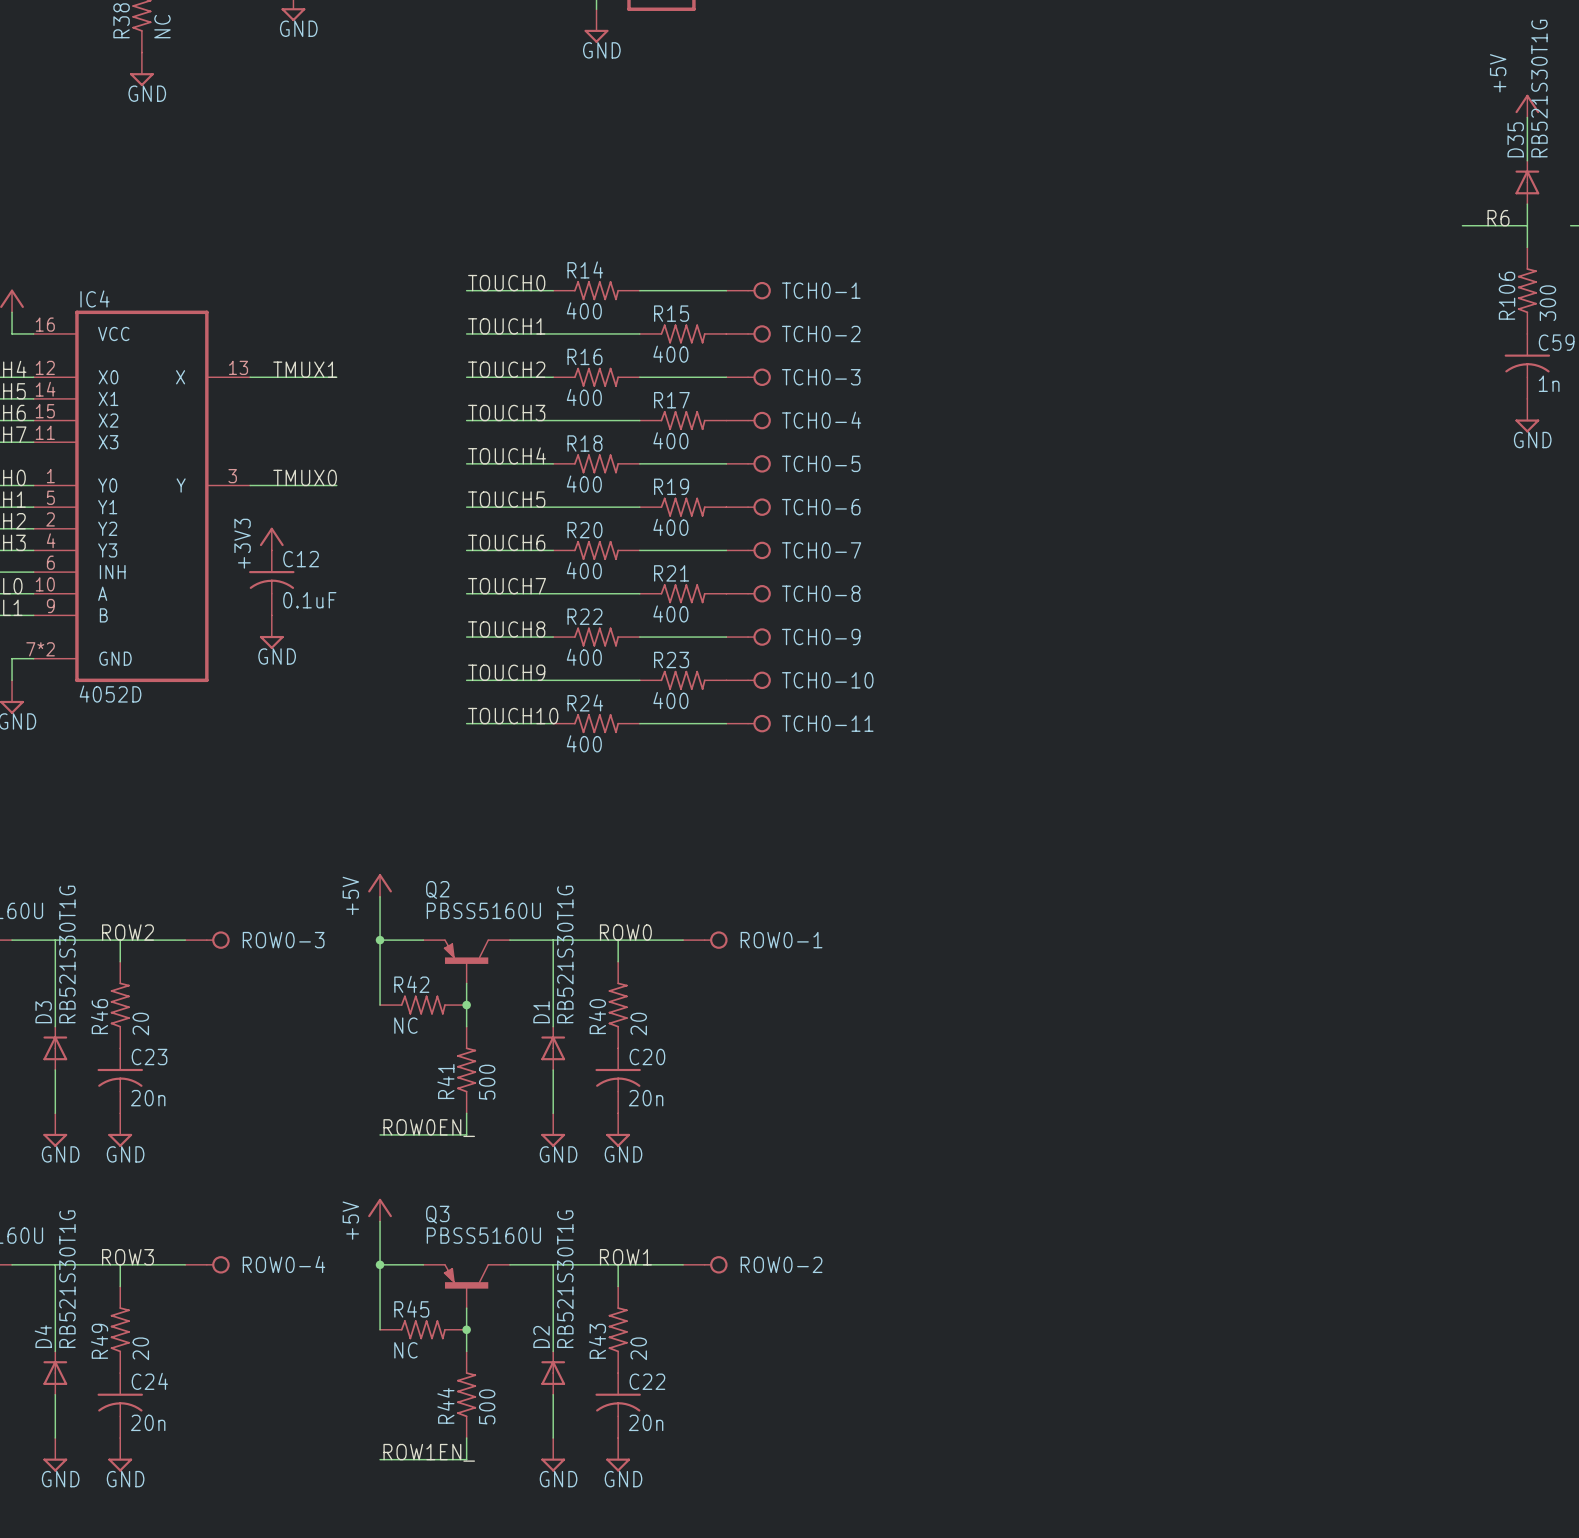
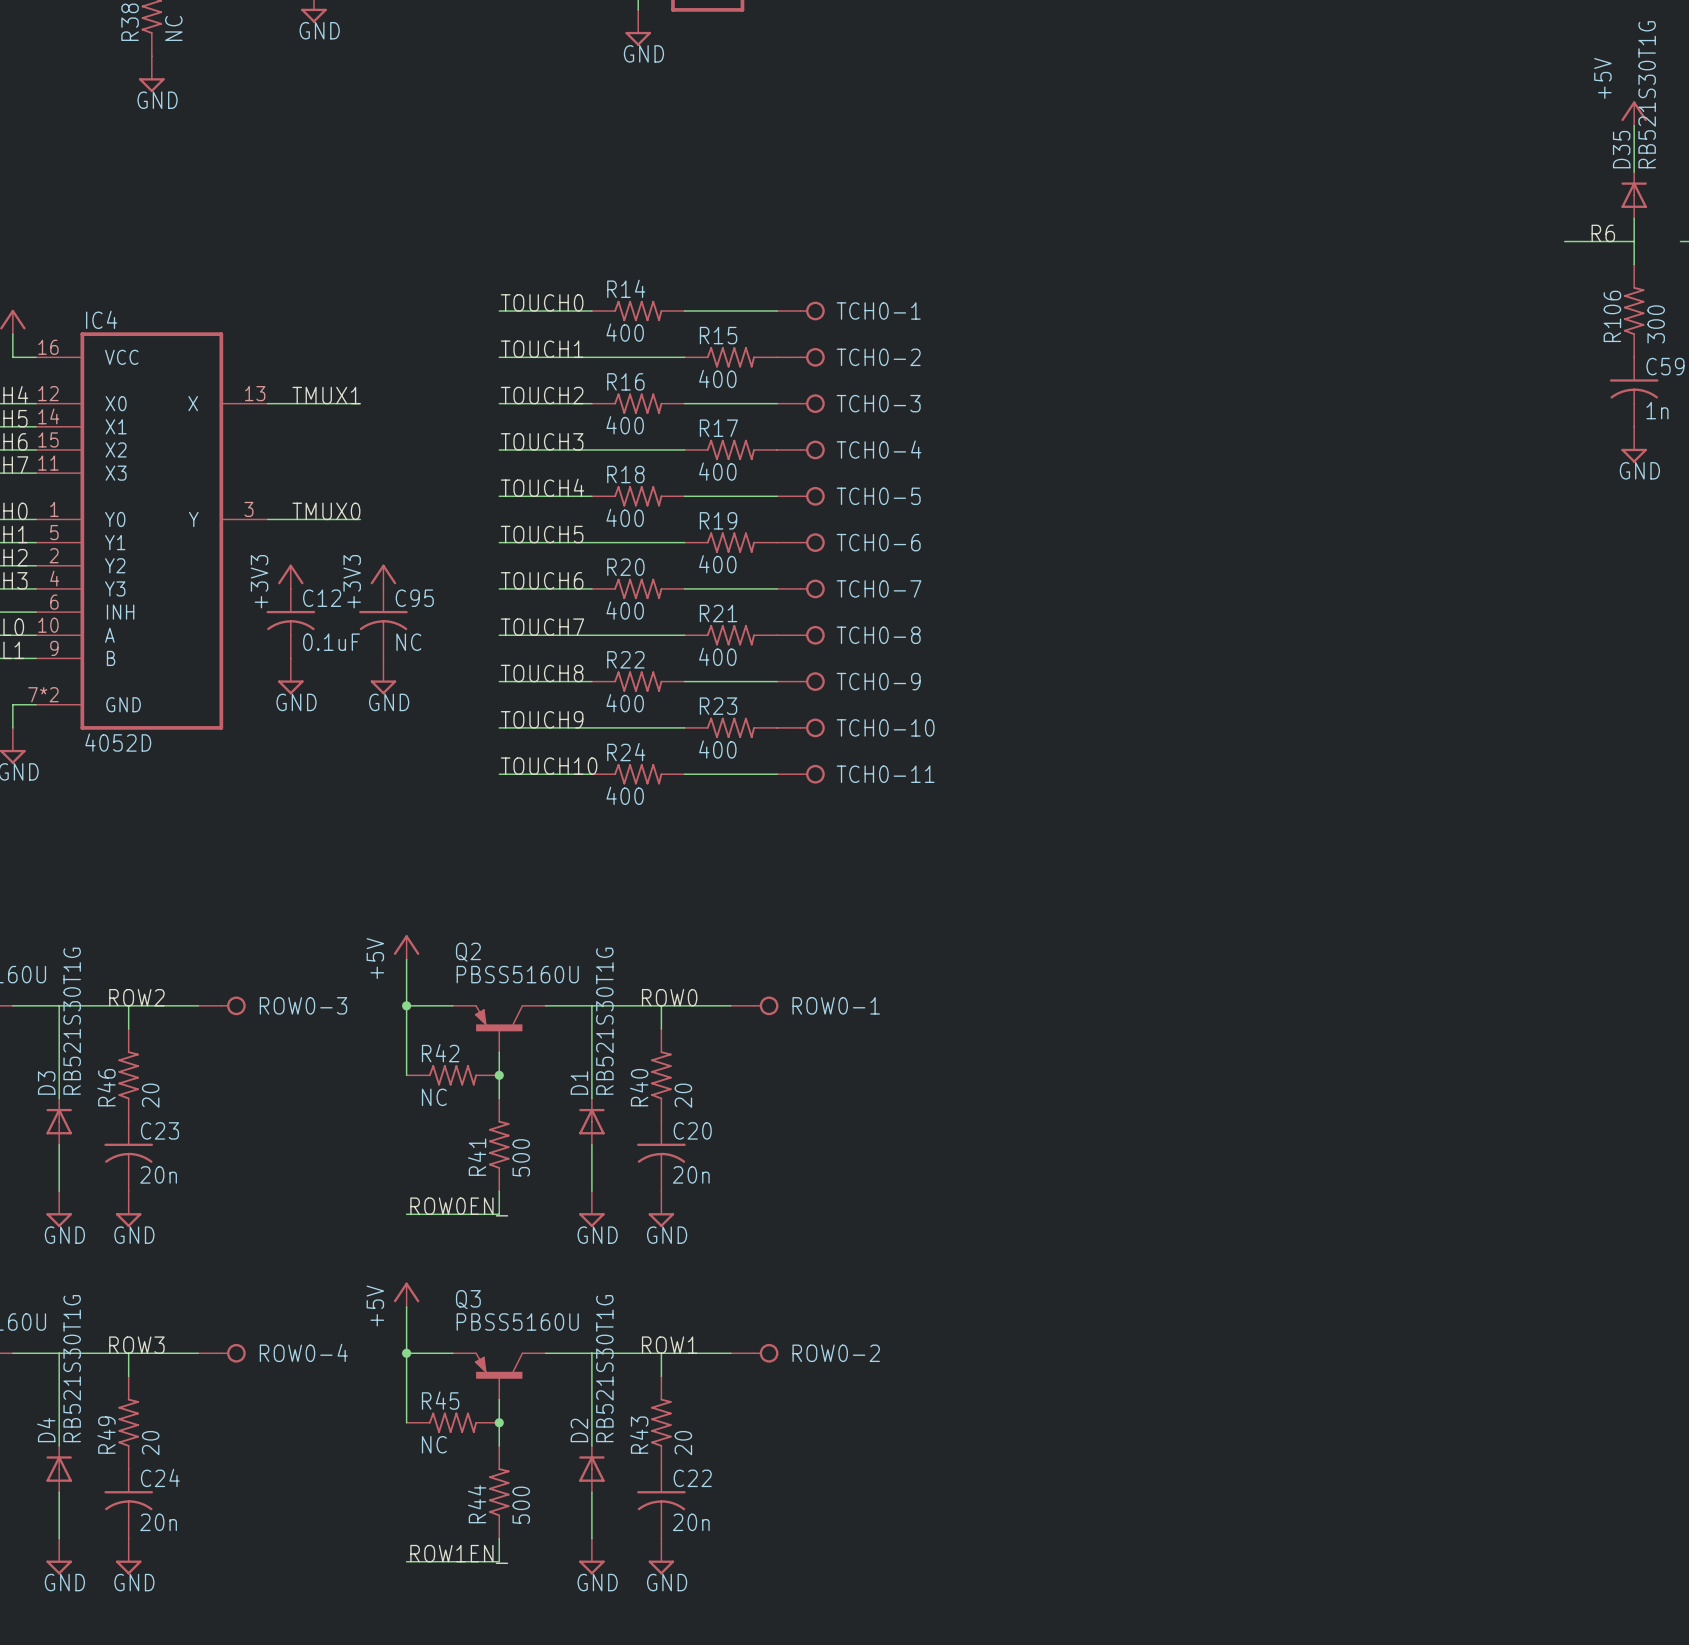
power symbol: none -> +3V3 (383, 576)
C95: none -> NC (383, 623)
power symbol: none -> GND (383, 676)

